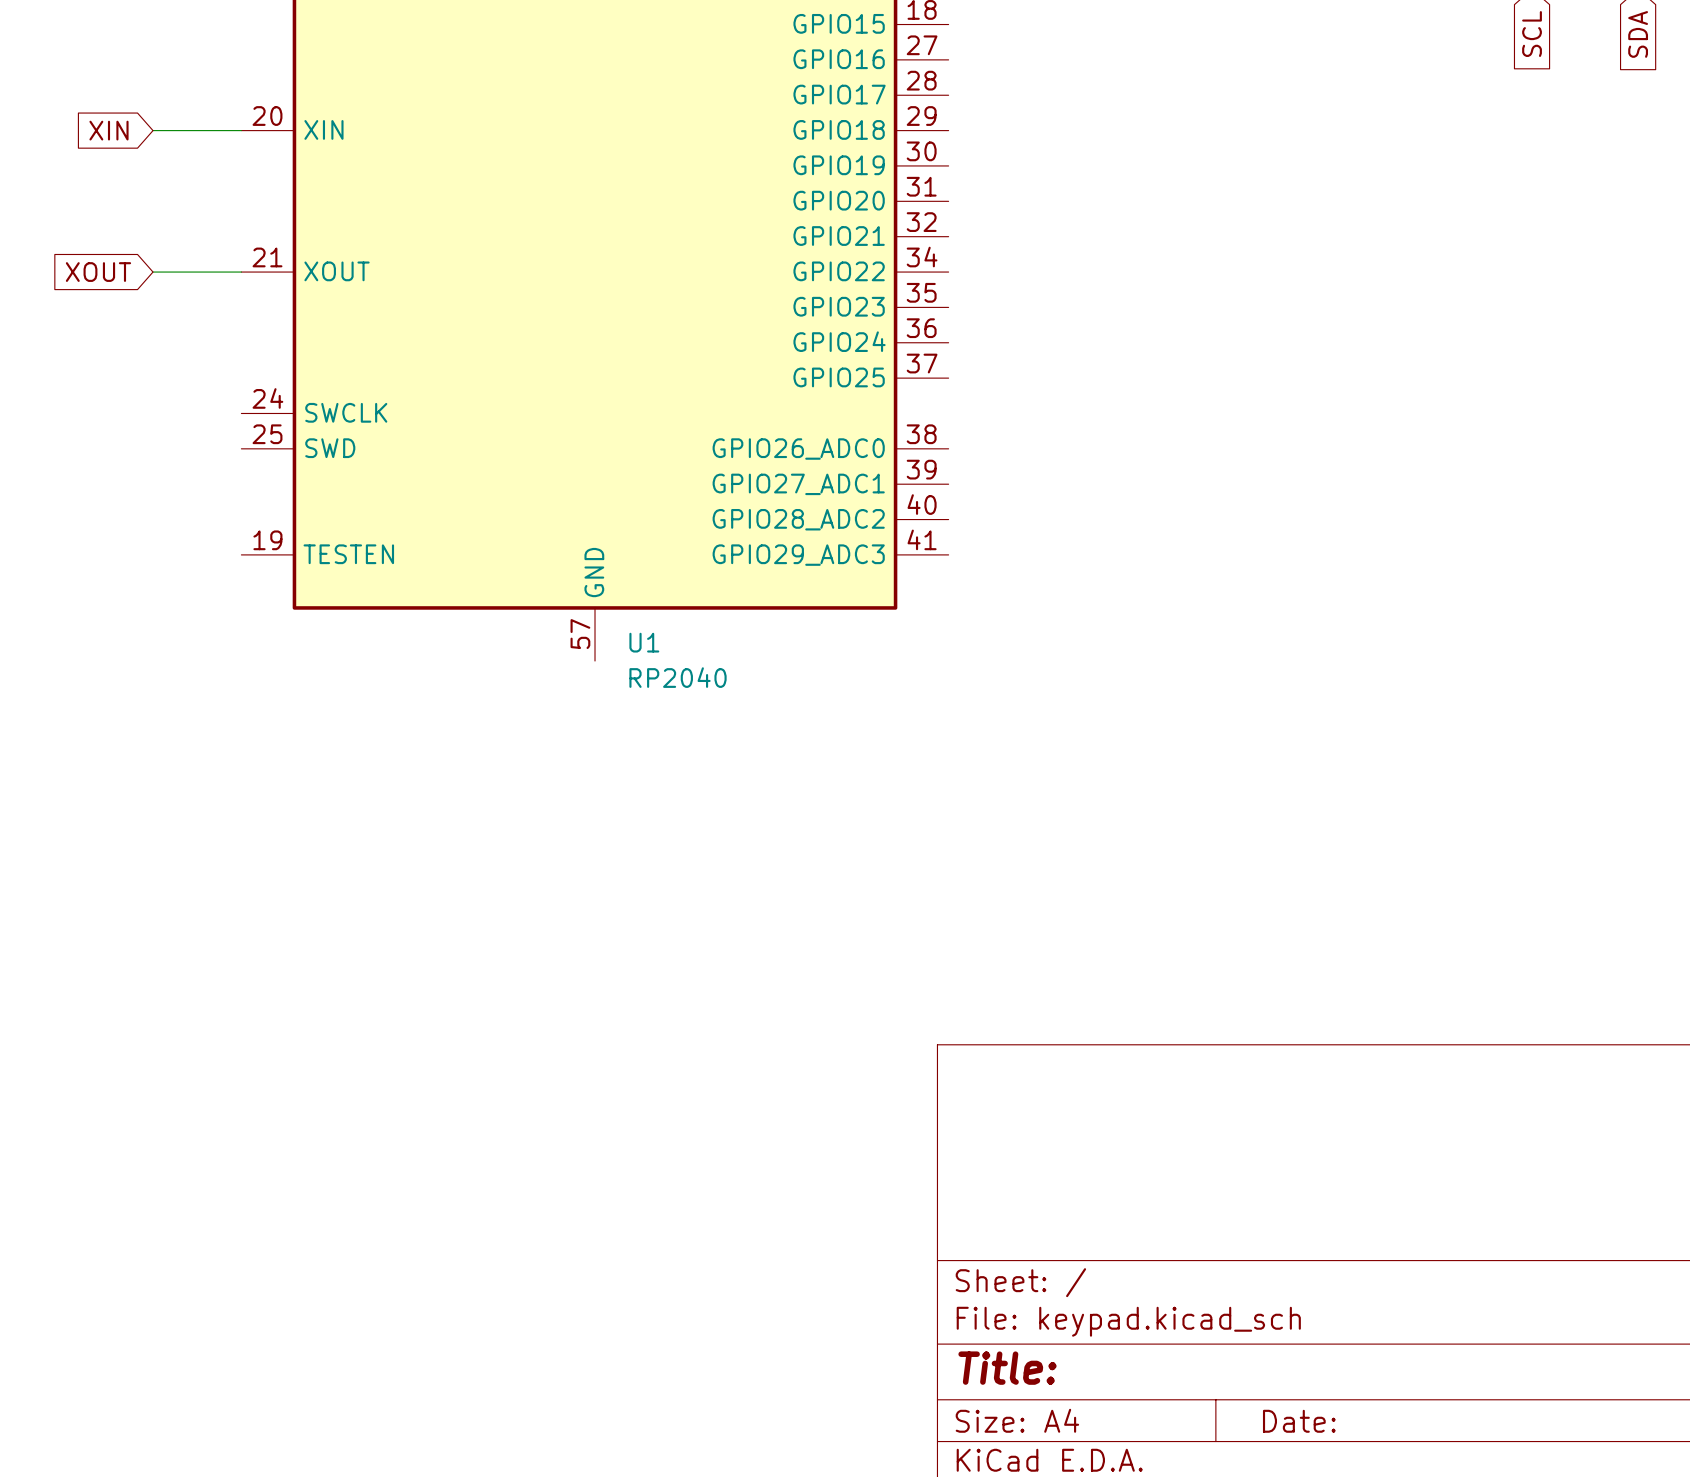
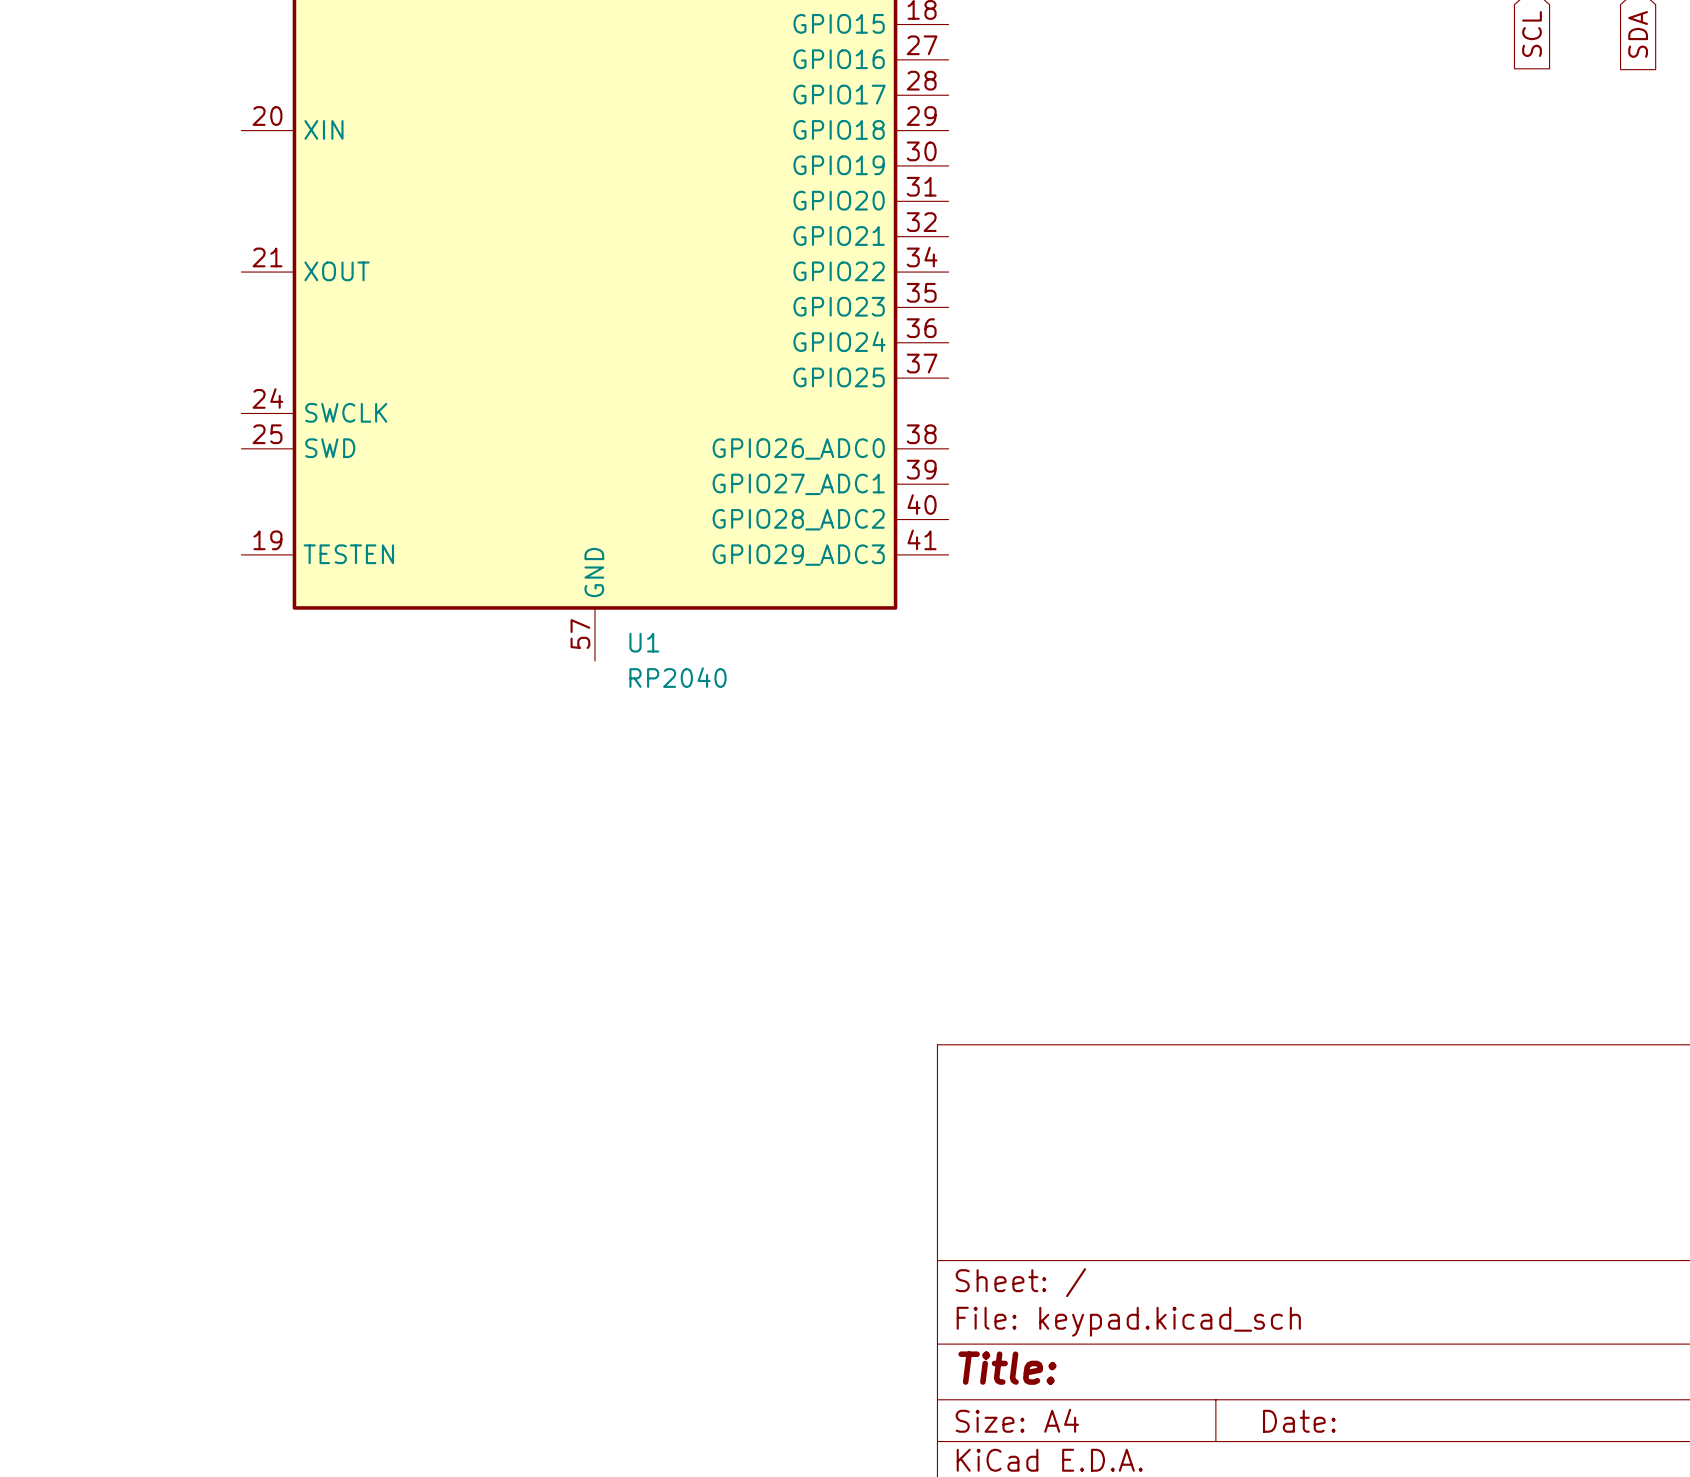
global label: XIN (108, 130) -> none
wire: (153, 130) (241, 130) -> none
global label: XOUT (98, 272) -> none
wire: (153, 272) (241, 272) -> none

